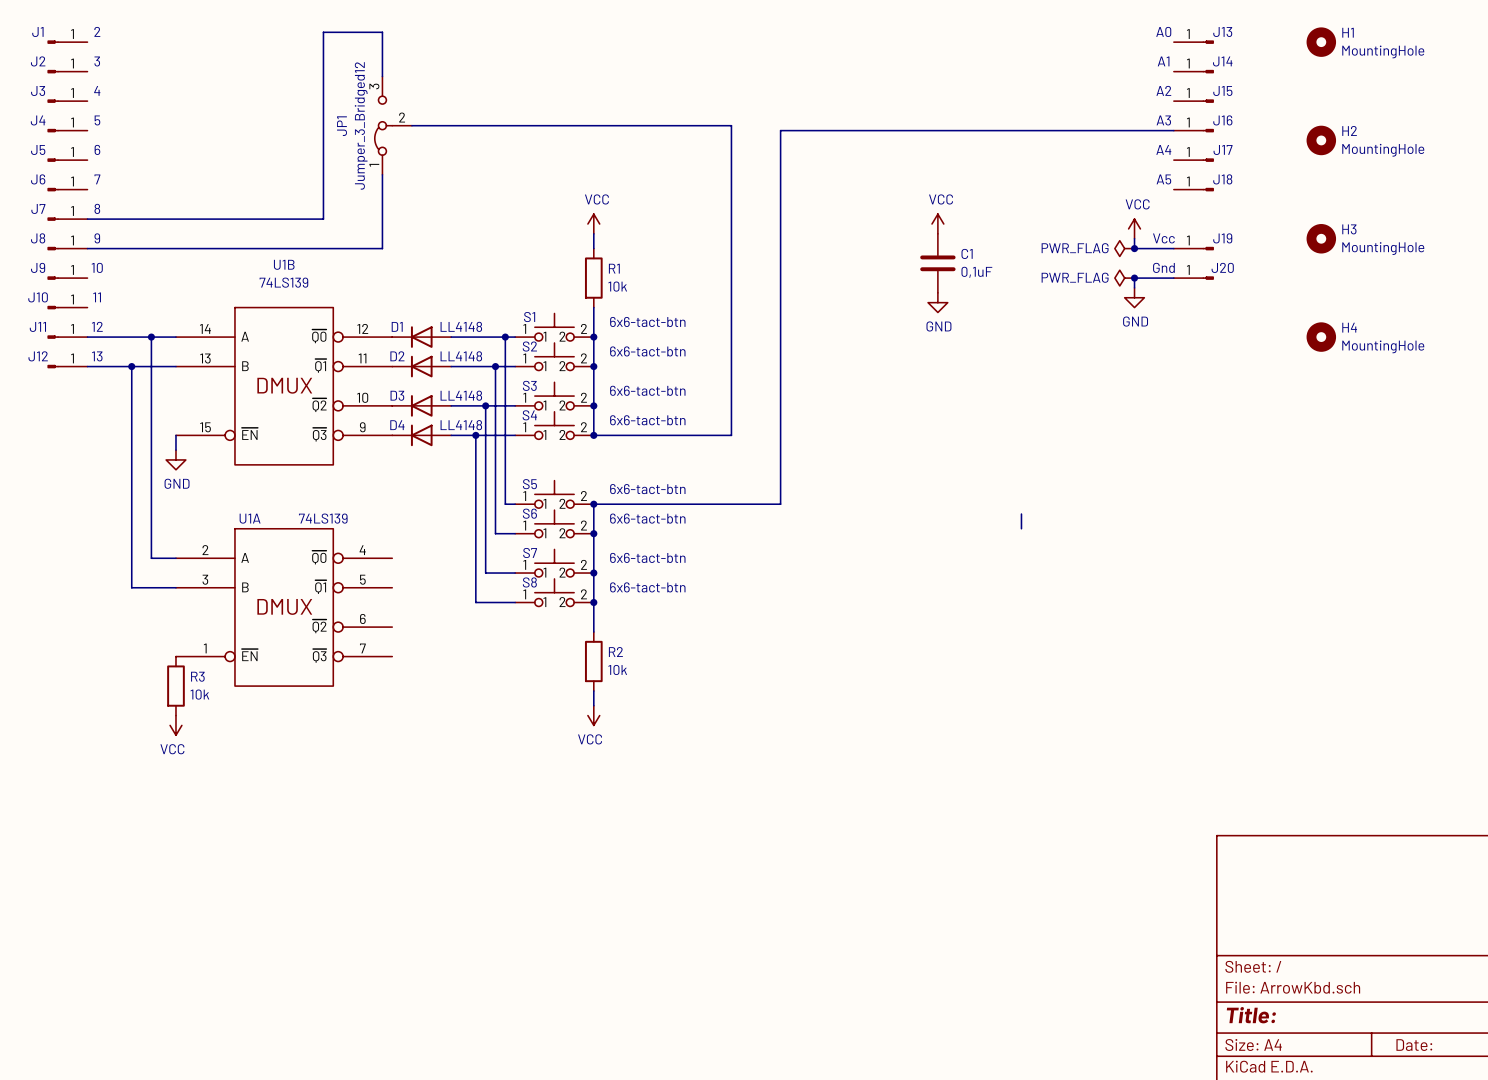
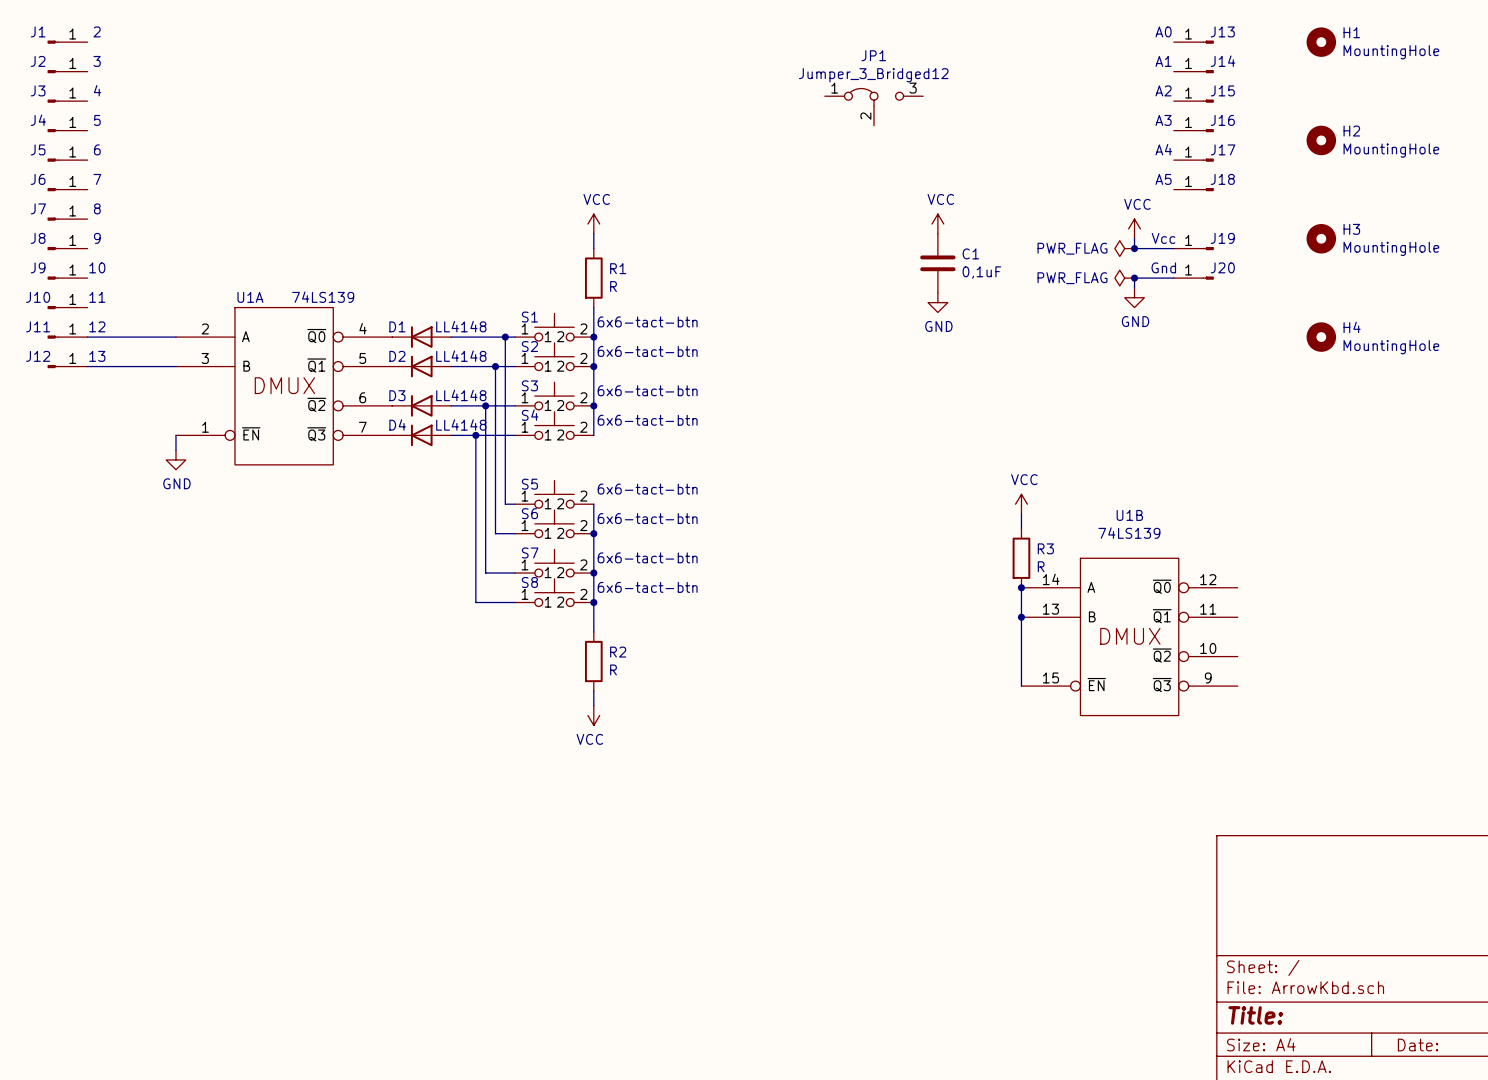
wire: (382, 76) (382, 32) (323, 32) (323, 219) (87, 219) -> none
JP1 rotation: 0° (383, 125) -> 90° clockwise (873, 97)
JP1 position: (393, 125) -> (873, 107)
wire: (411, 125) (731, 125) (731, 435) (593, 435) -> none
wire: (1173, 130) (780, 130) (780, 504) (593, 504) -> none
wire: (382, 174) (382, 248) (87, 248) -> none
R1 value: 10k (617, 286) -> R (613, 286)
wire: (151, 337) (151, 558) (175, 558) -> none
junction: (151, 337) -> none
wire: (131, 366) (131, 587) (175, 587) -> none
junction: (131, 366) -> none
U1B position: (284, 386) -> (1129, 636)
junction: (593, 435) -> none
junction: (593, 504) -> none
power symbol: none -> VCC (1021, 504)
wire: none -> (1021, 587) (1021, 686)
junction: none -> (1021, 587)
U1A position: (284, 607) -> (284, 386)
junction: none -> (1021, 617)
R2 value: 10k (617, 669) -> R (613, 669)
R3 position: (175, 686) -> (1021, 558)
R3 value: 10k (199, 694) -> R (1041, 566)
power symbol: VCC (175, 725) -> none

